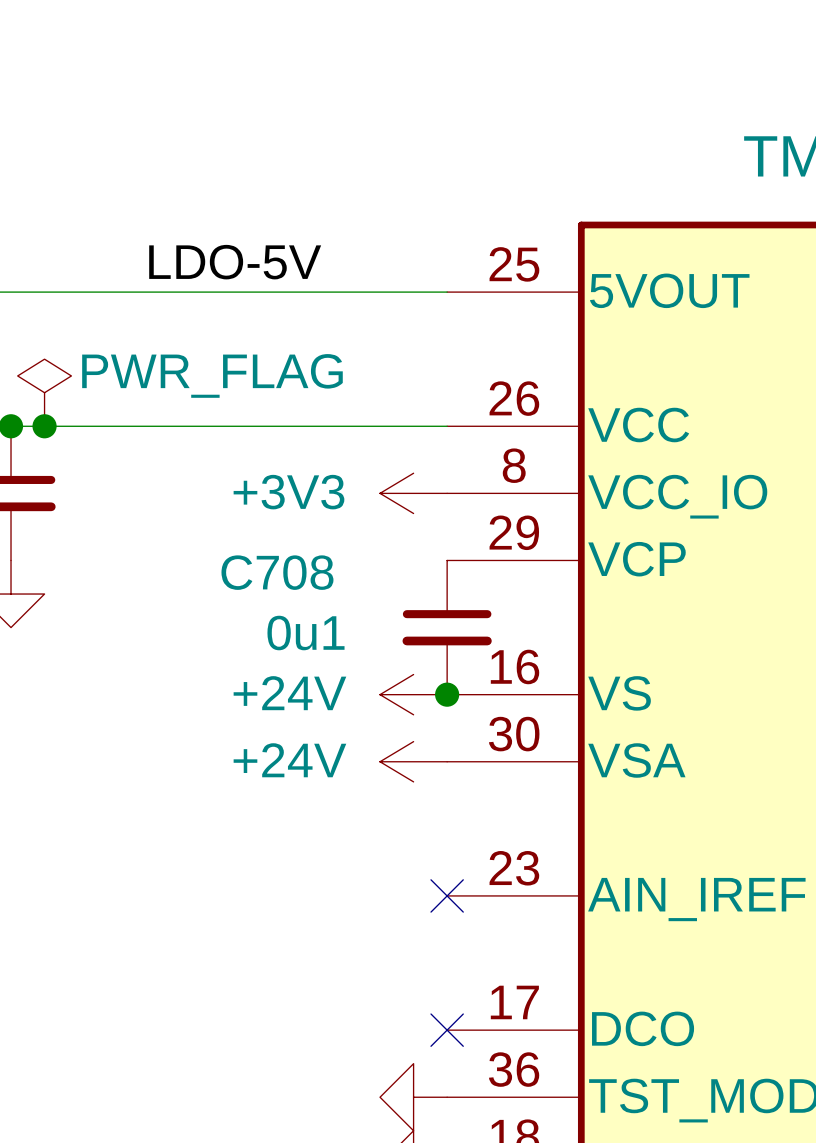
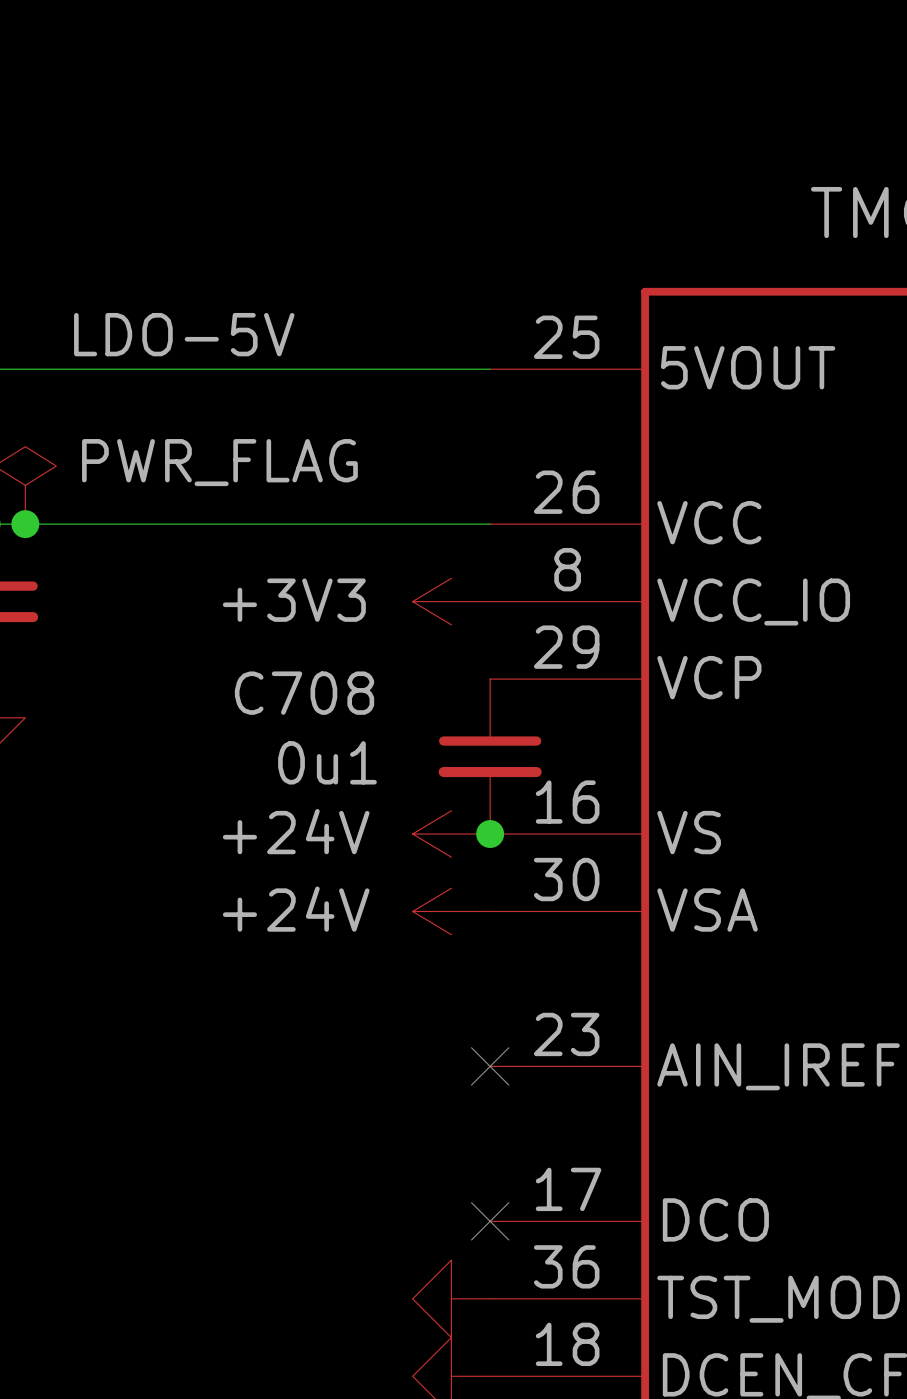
label position: LDO-5V (235, 262) -> LDO-5V (184, 334)

